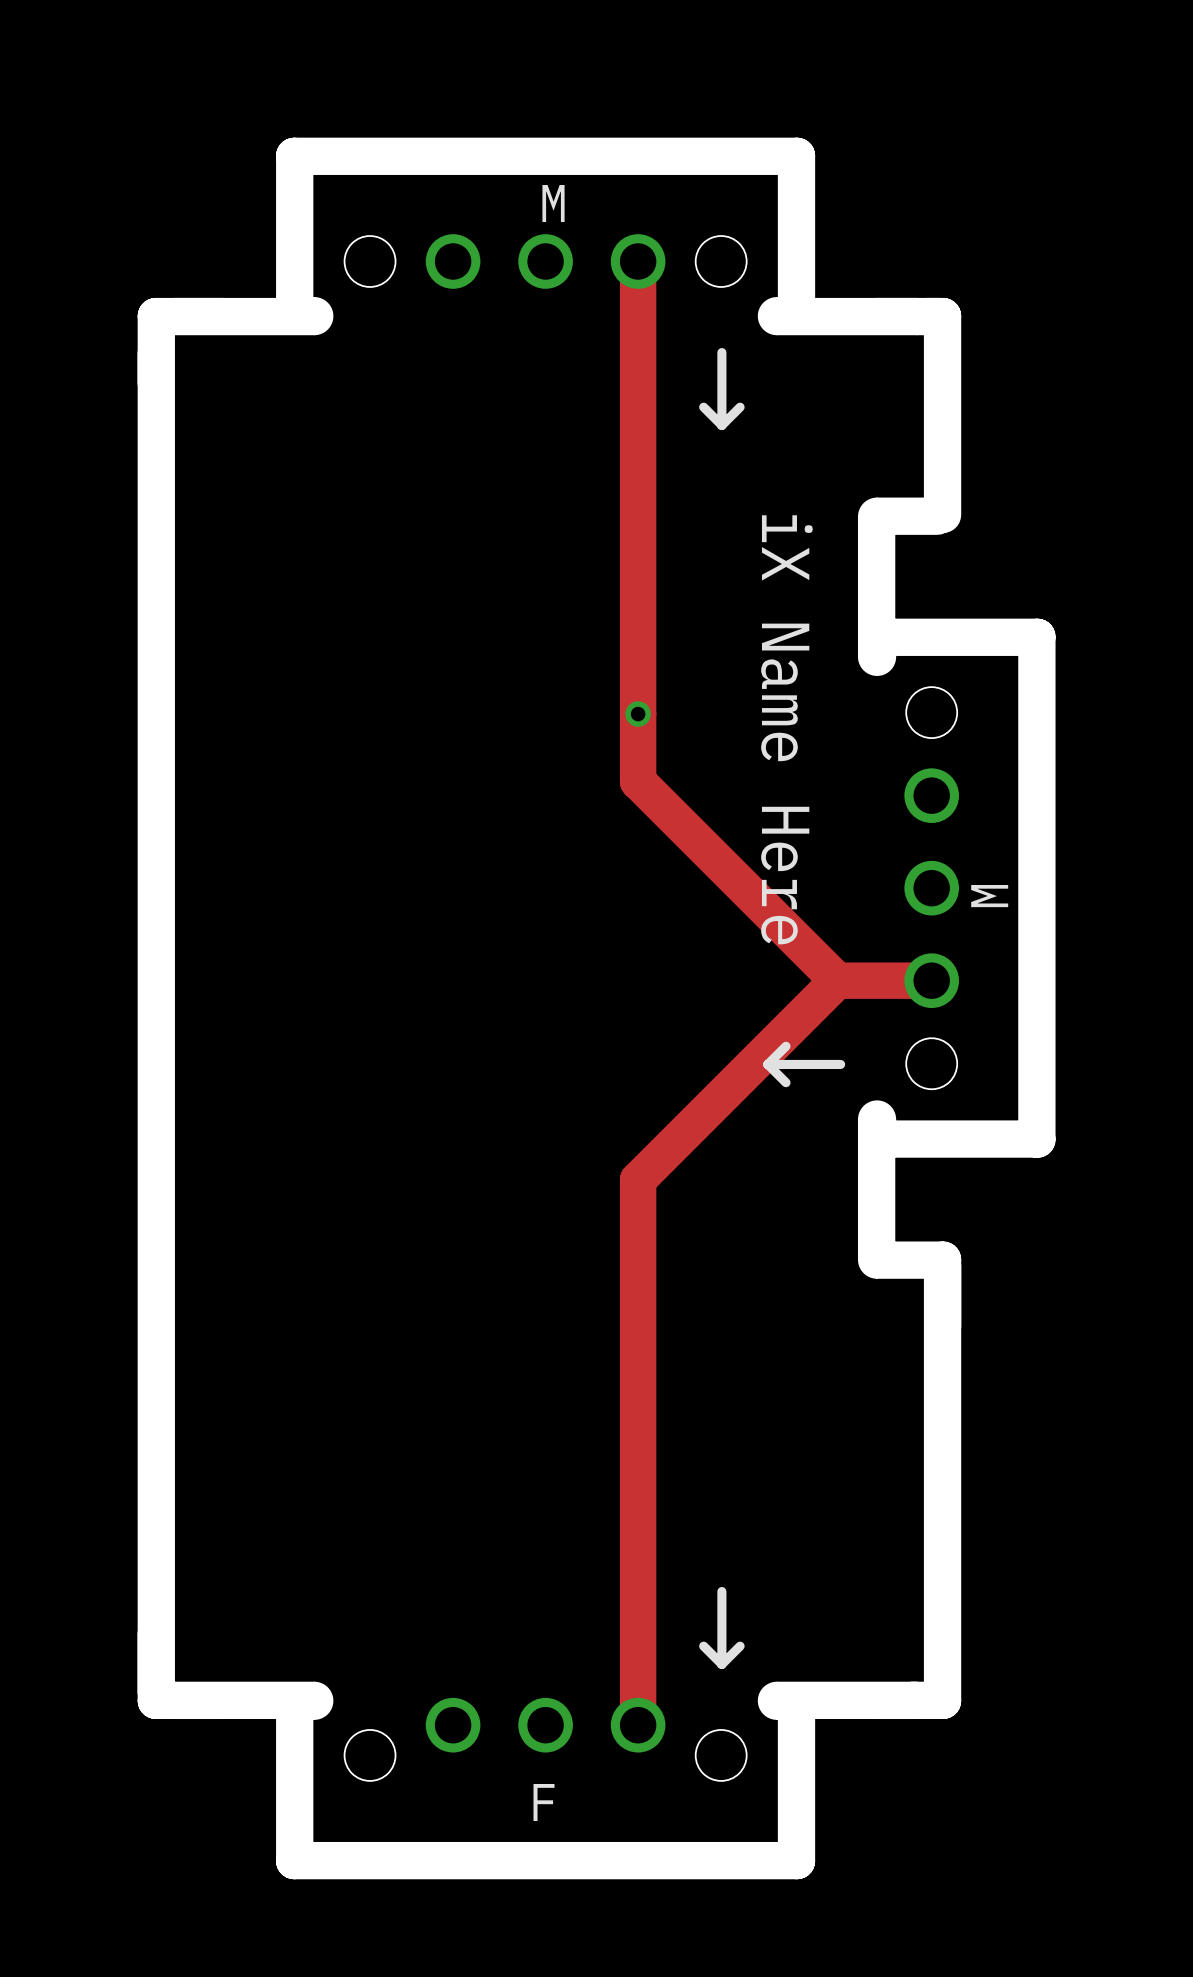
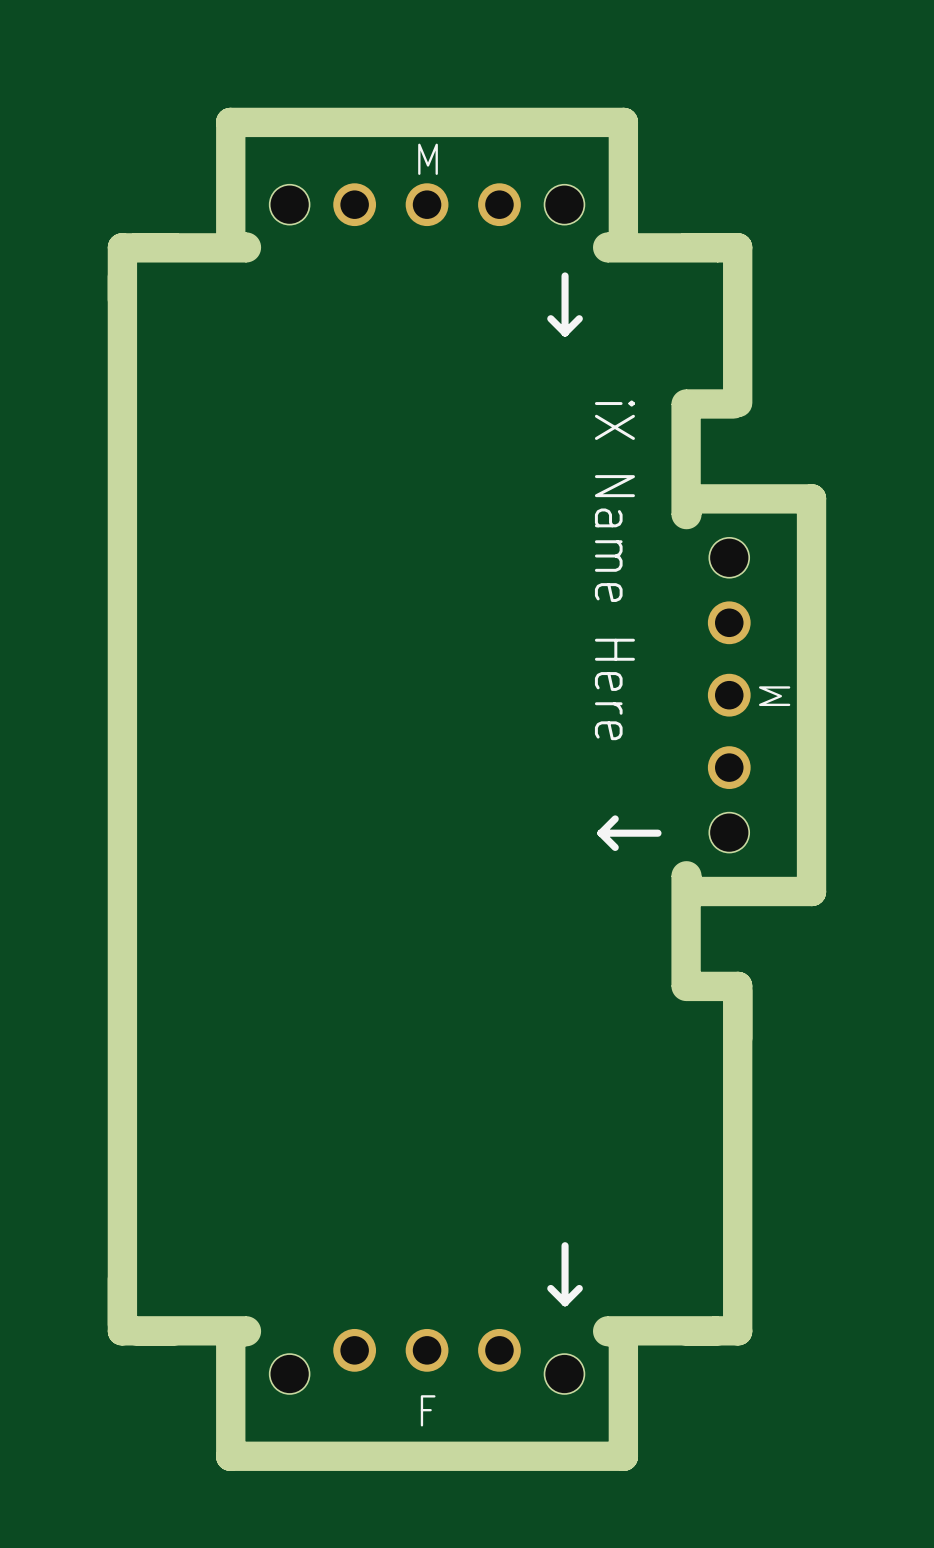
track: (638, 261) (638, 781) (837, 980) -> none
via: (638, 714) -> none
track: (837, 980) (931, 980) -> none
track: (837, 980) (638, 1179) (638, 1725) -> none

